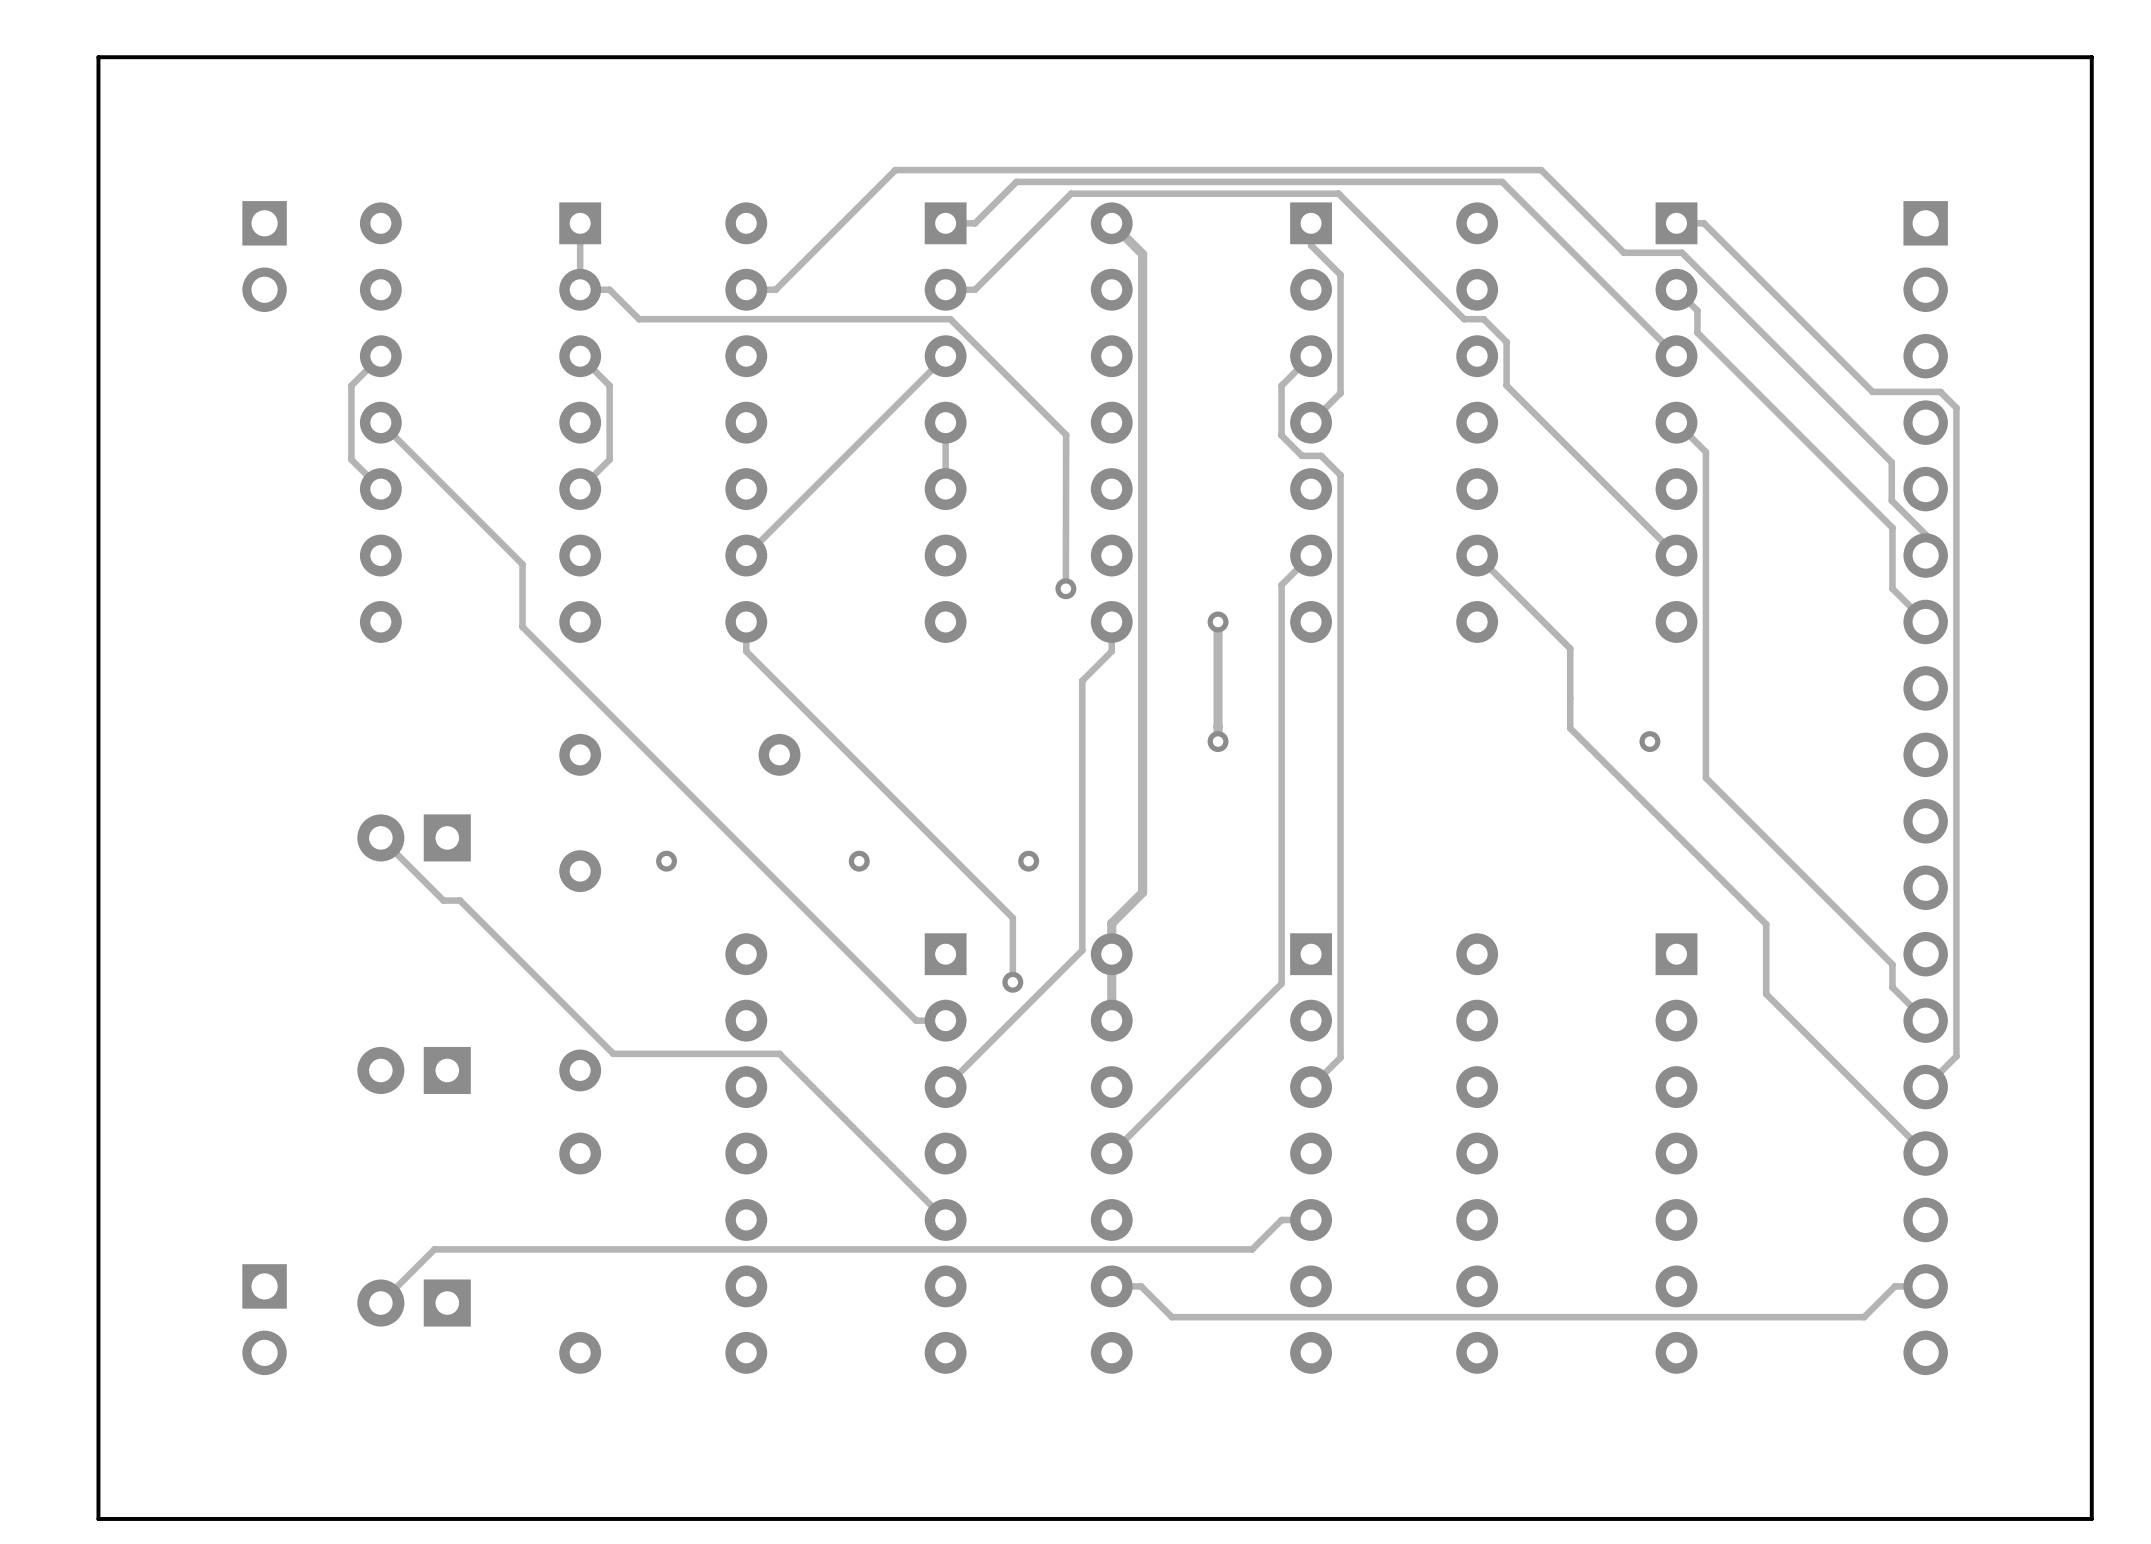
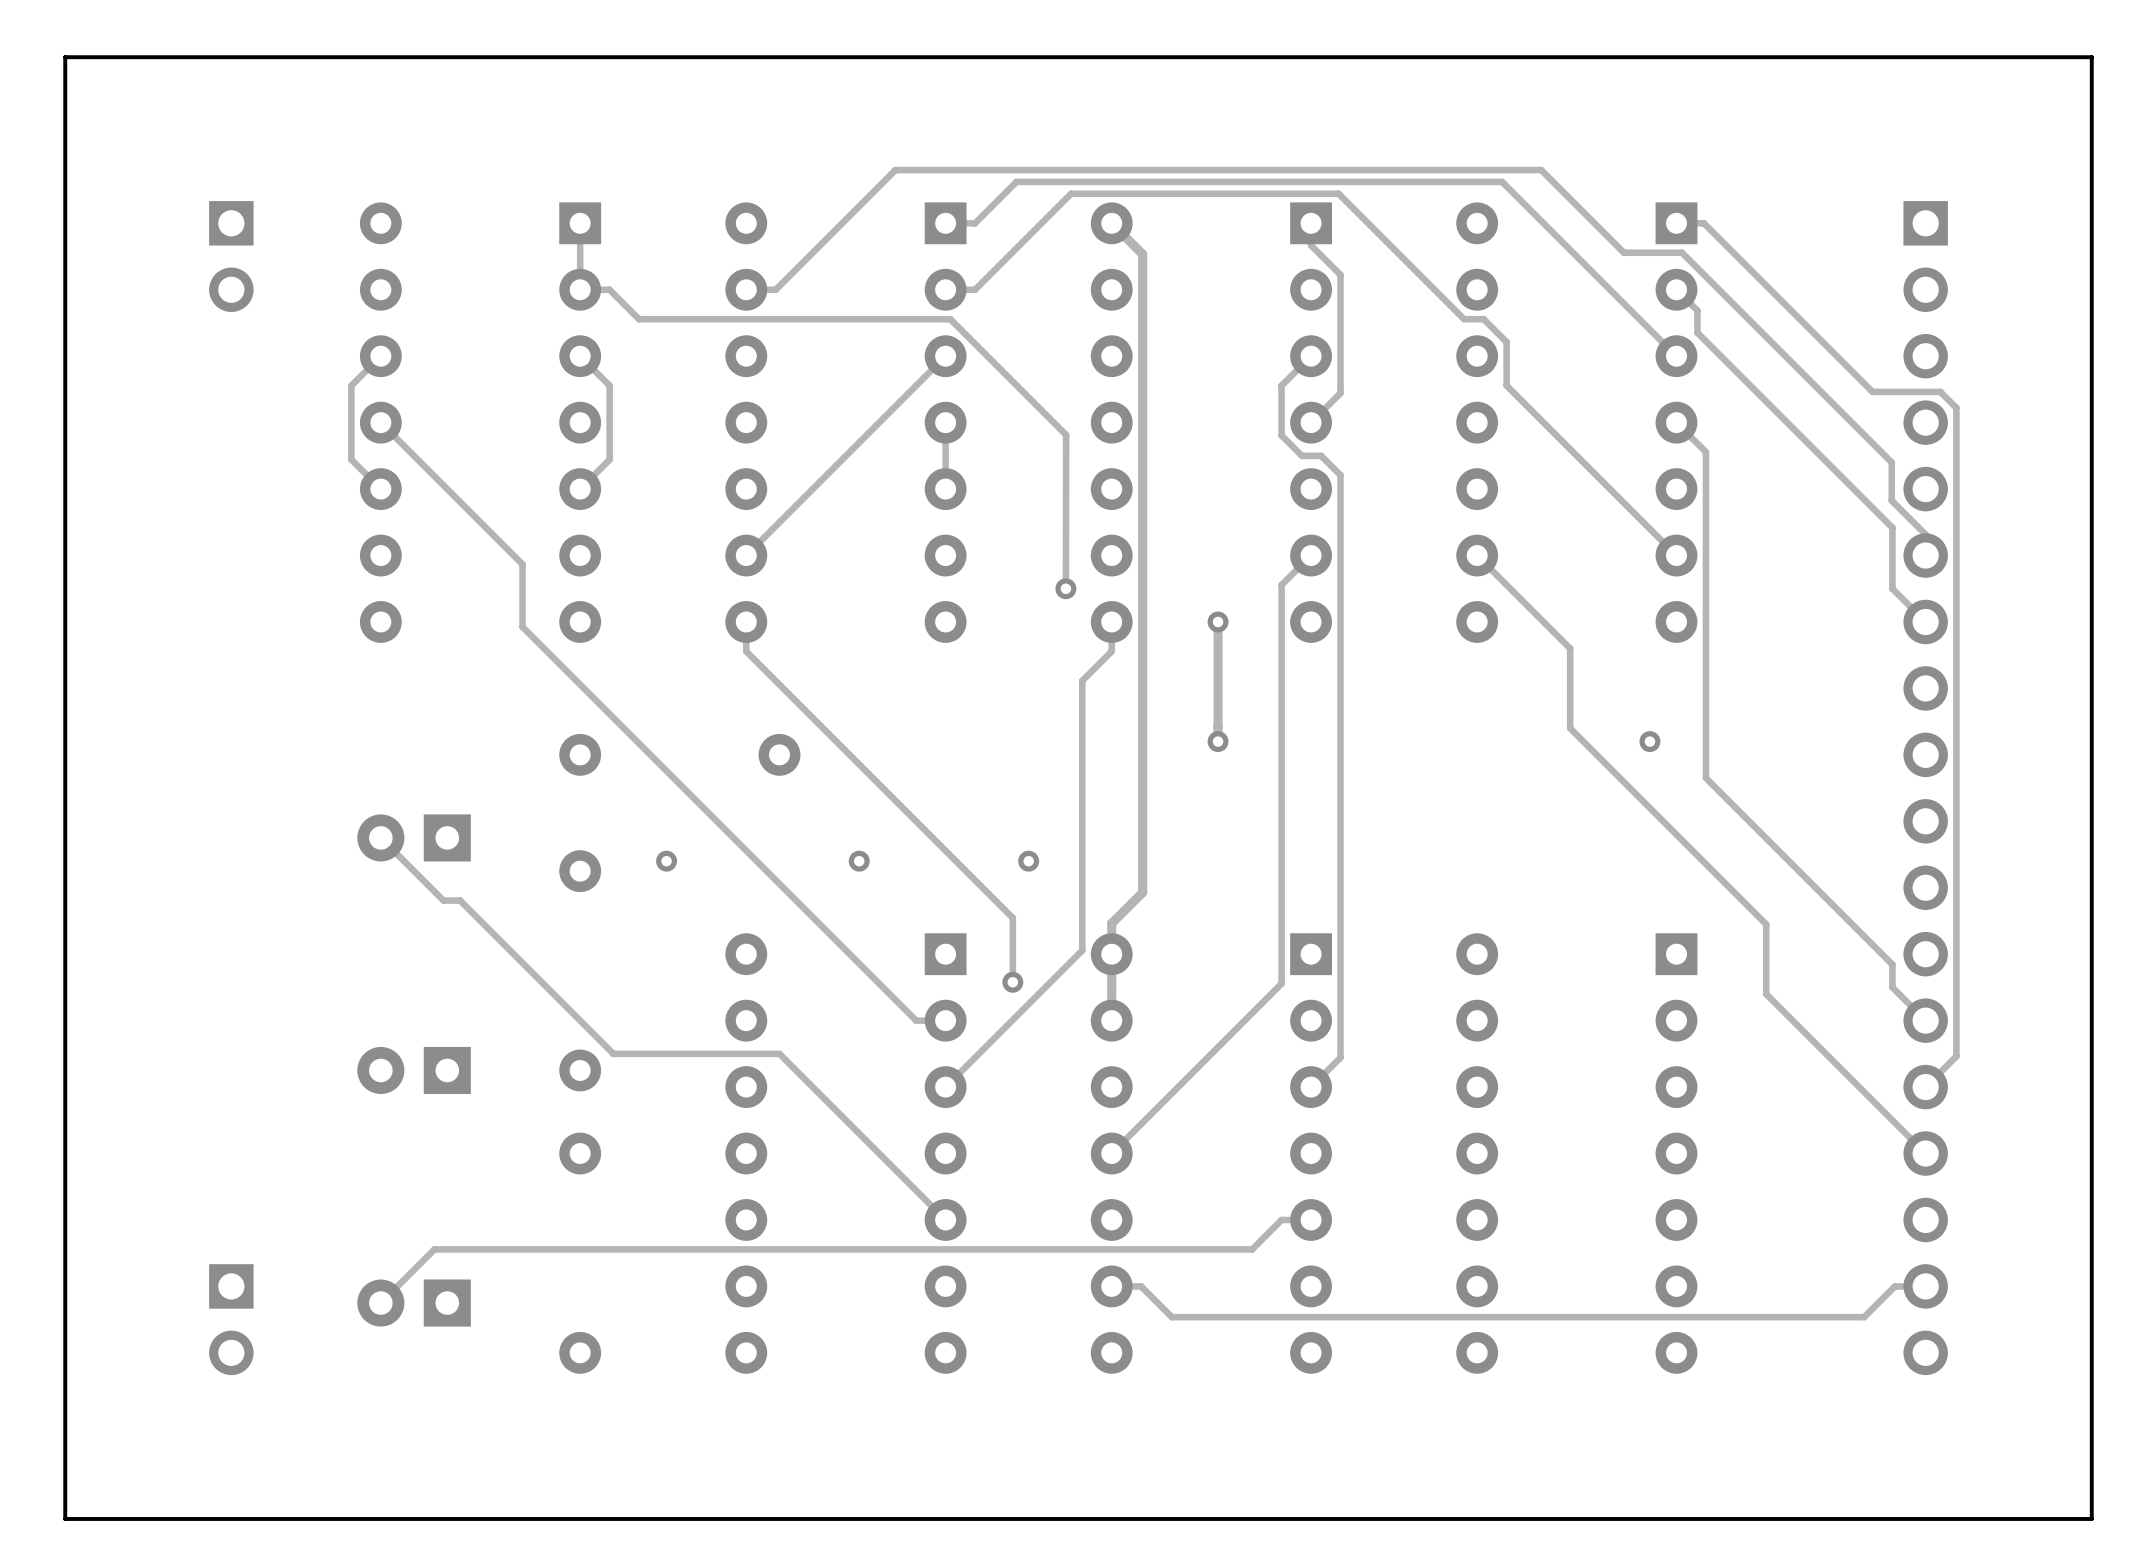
board edge: (98, 57) (98, 1518) -> (98, 57) (65, 57) (65, 1518) (98, 1518)
part position: (264, 256) -> (231, 256)
part position: (264, 1319) -> (231, 1319)

